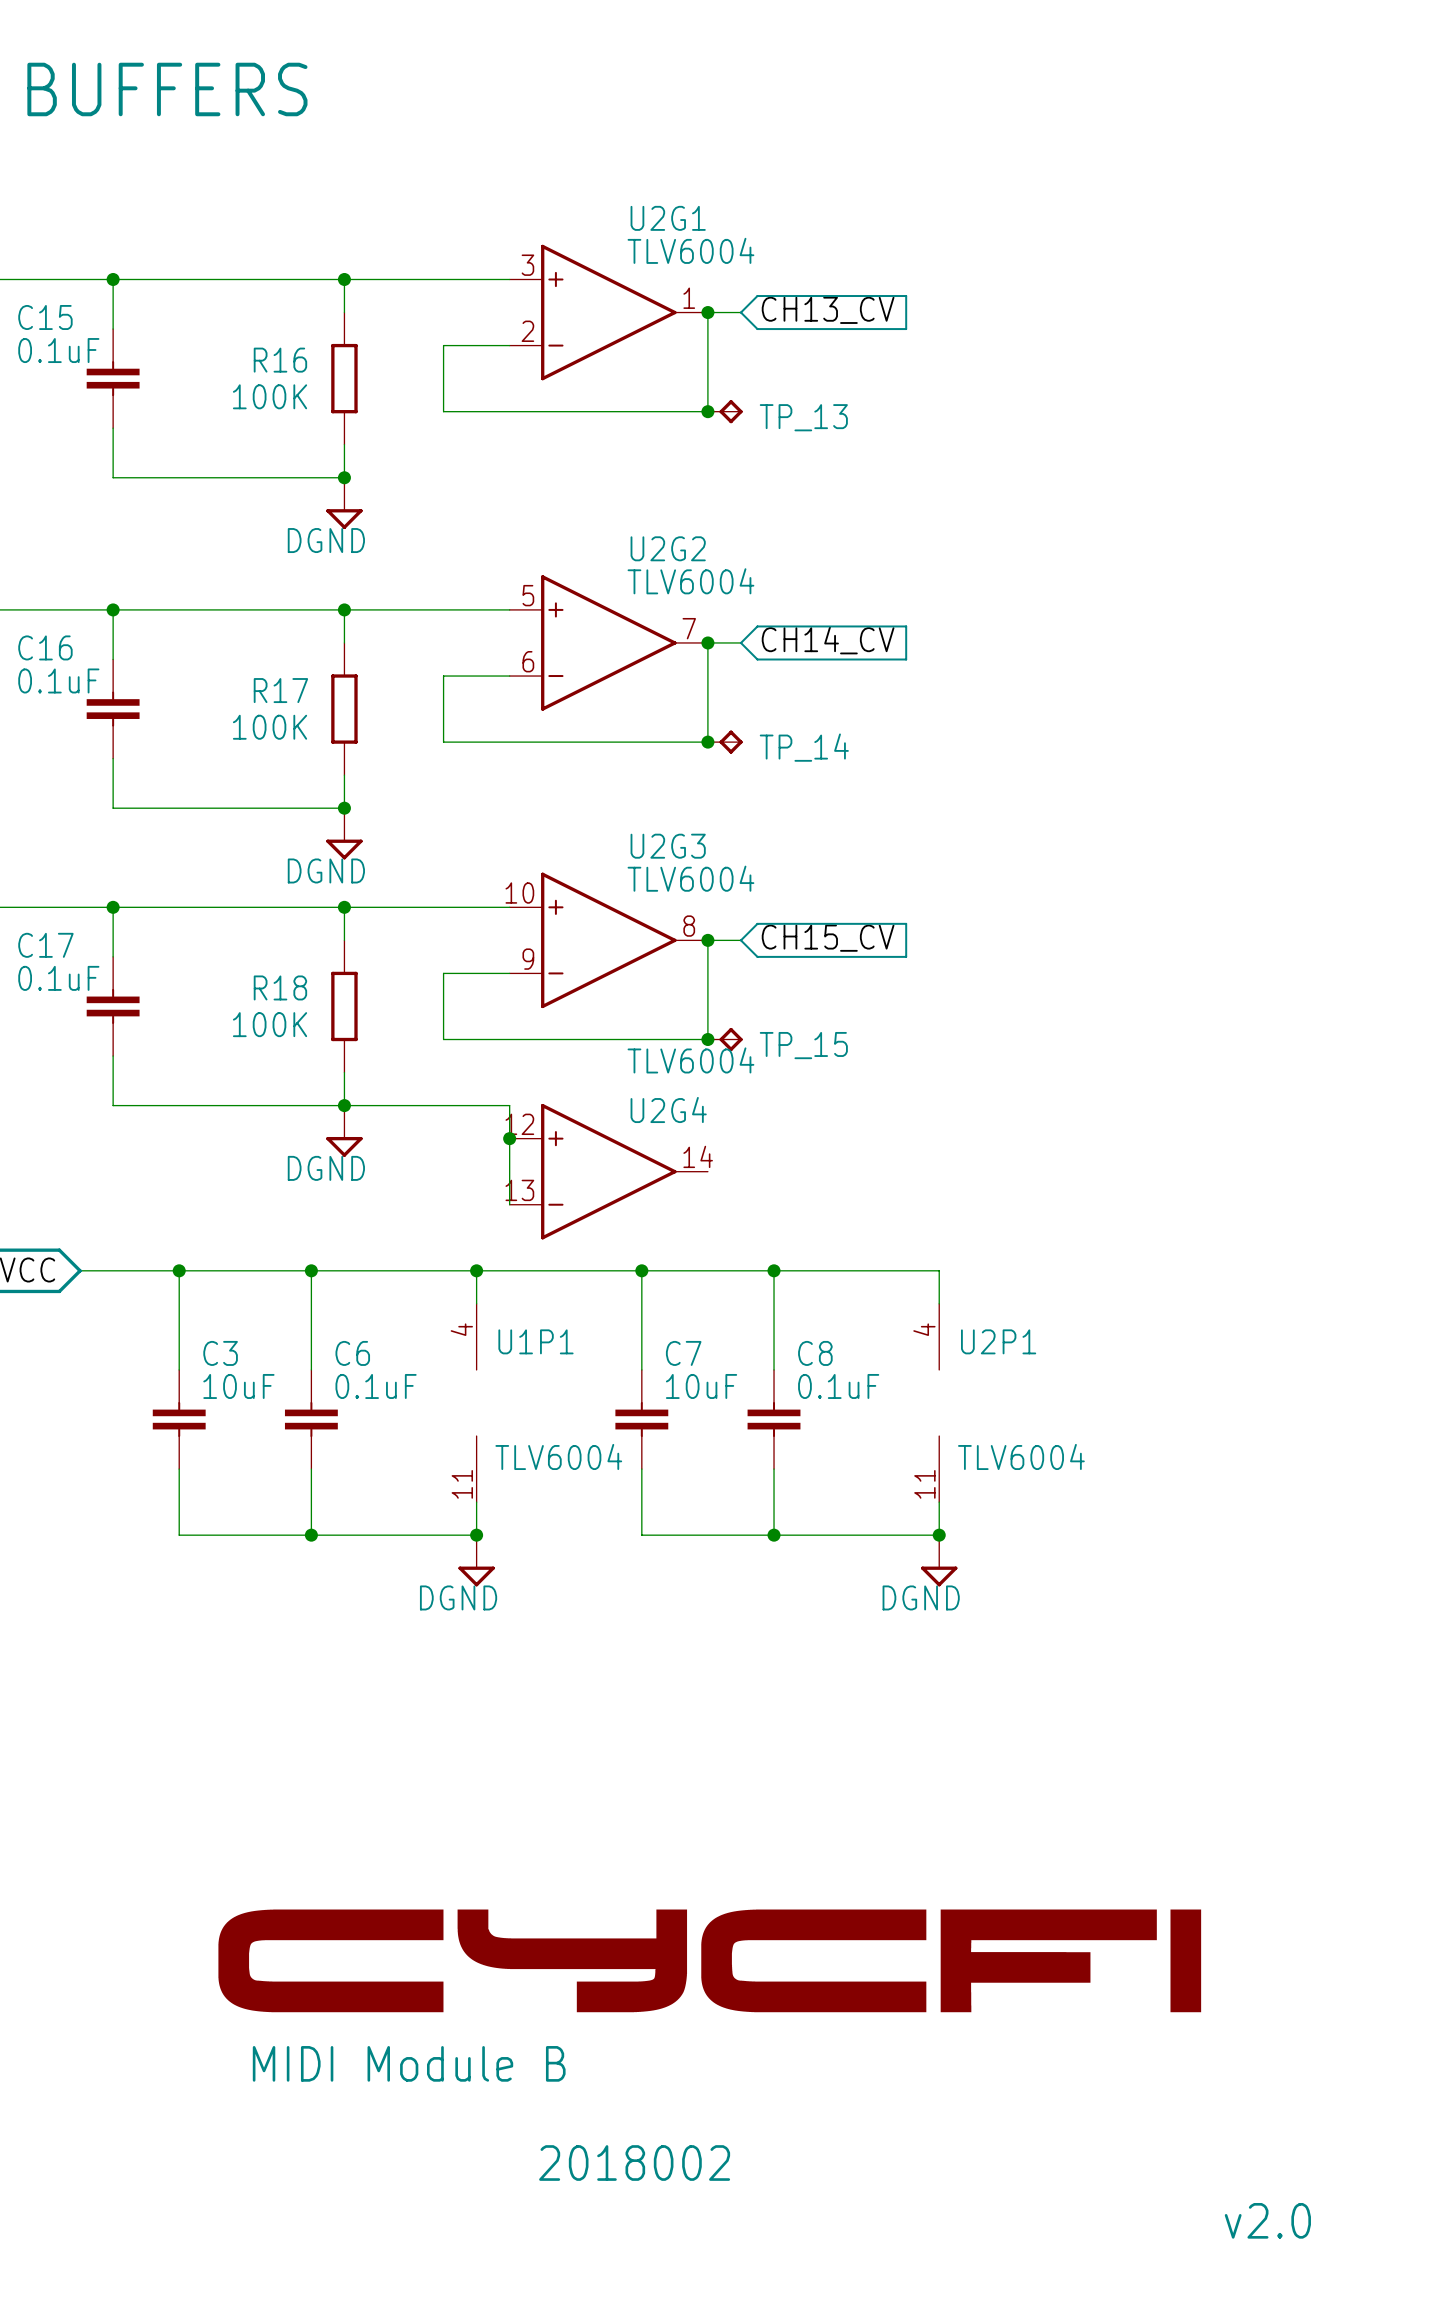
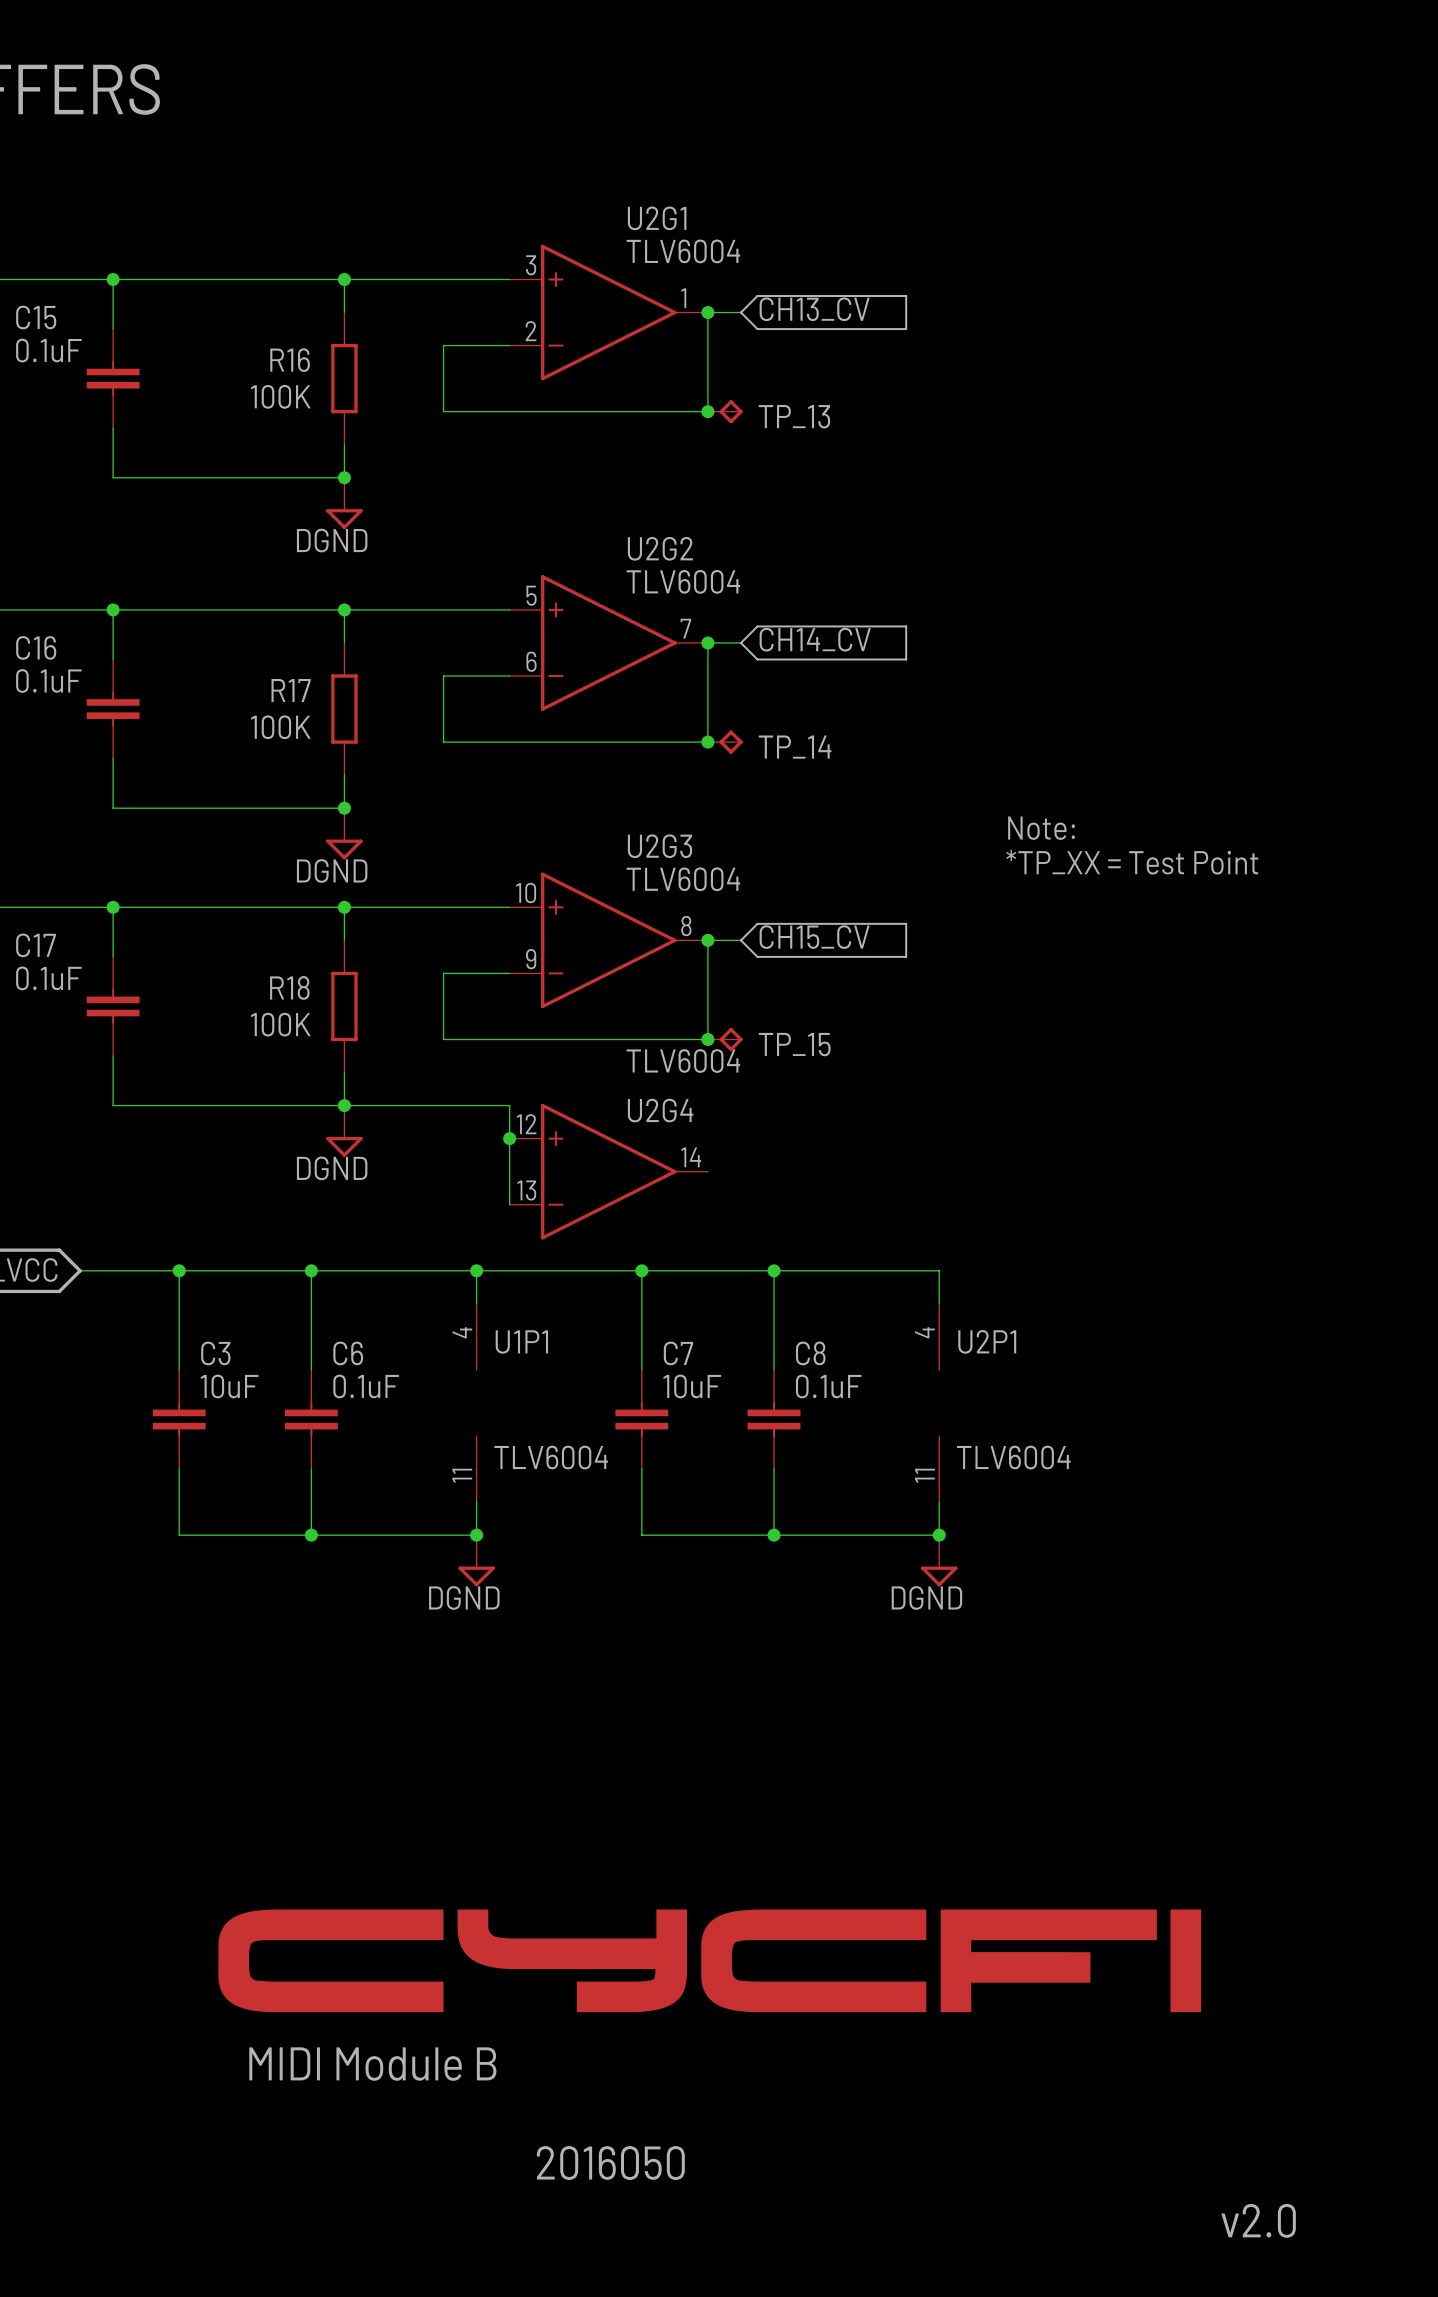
text: none -> Note: (1041, 828)
text: none -> *TP_XX = Test Point (1132, 862)
text: 2018002 (634, 2163) -> 2016050 (610, 2163)

